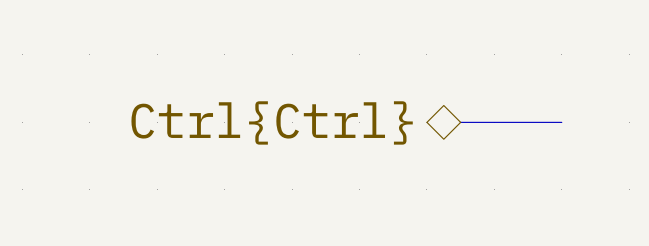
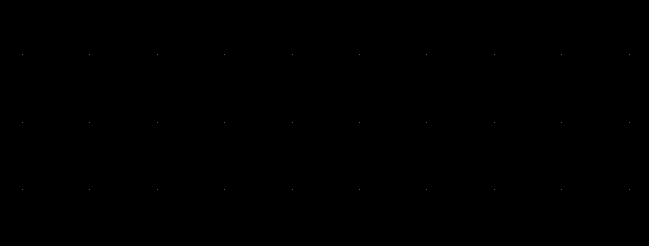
hierarchical label: Ctrl{Ctrl} (272, 122) -> none
bus: (460, 122) (561, 122) -> none

